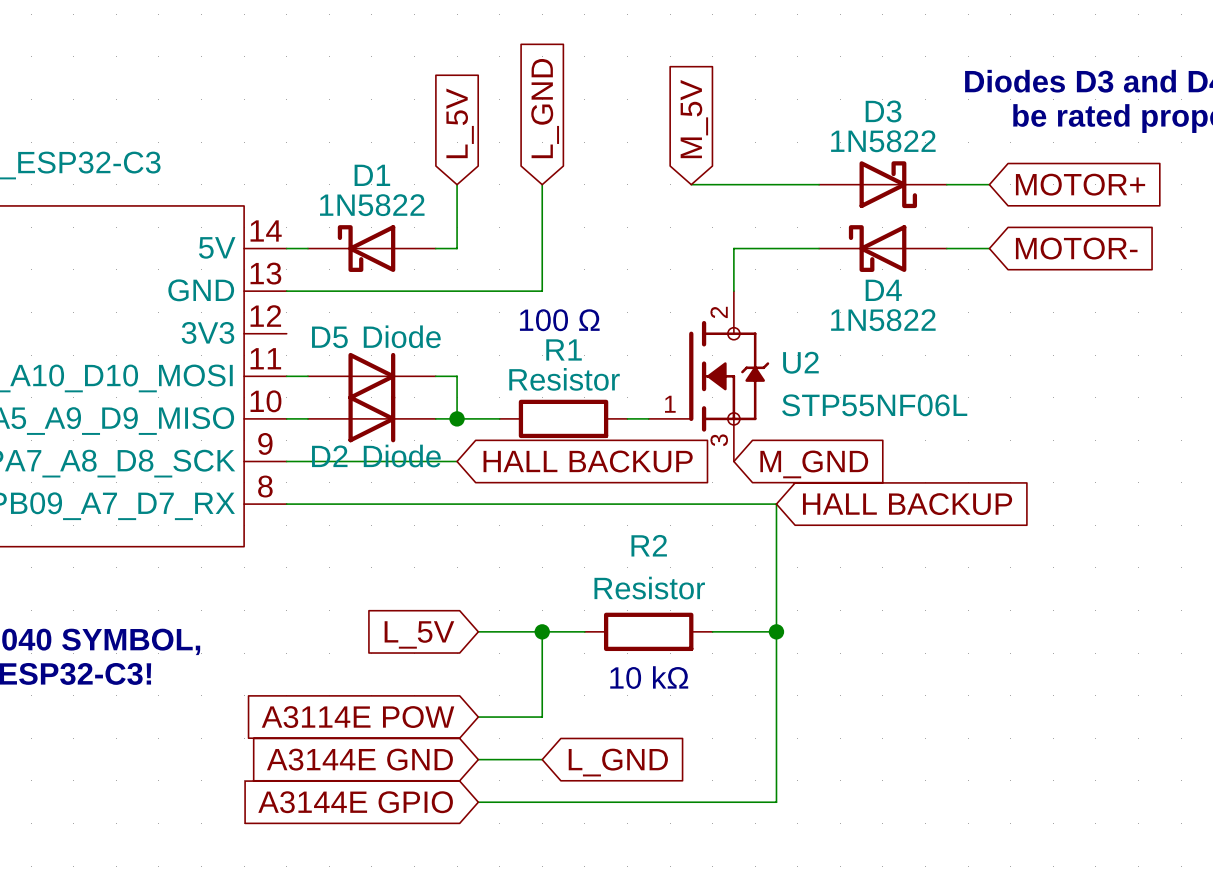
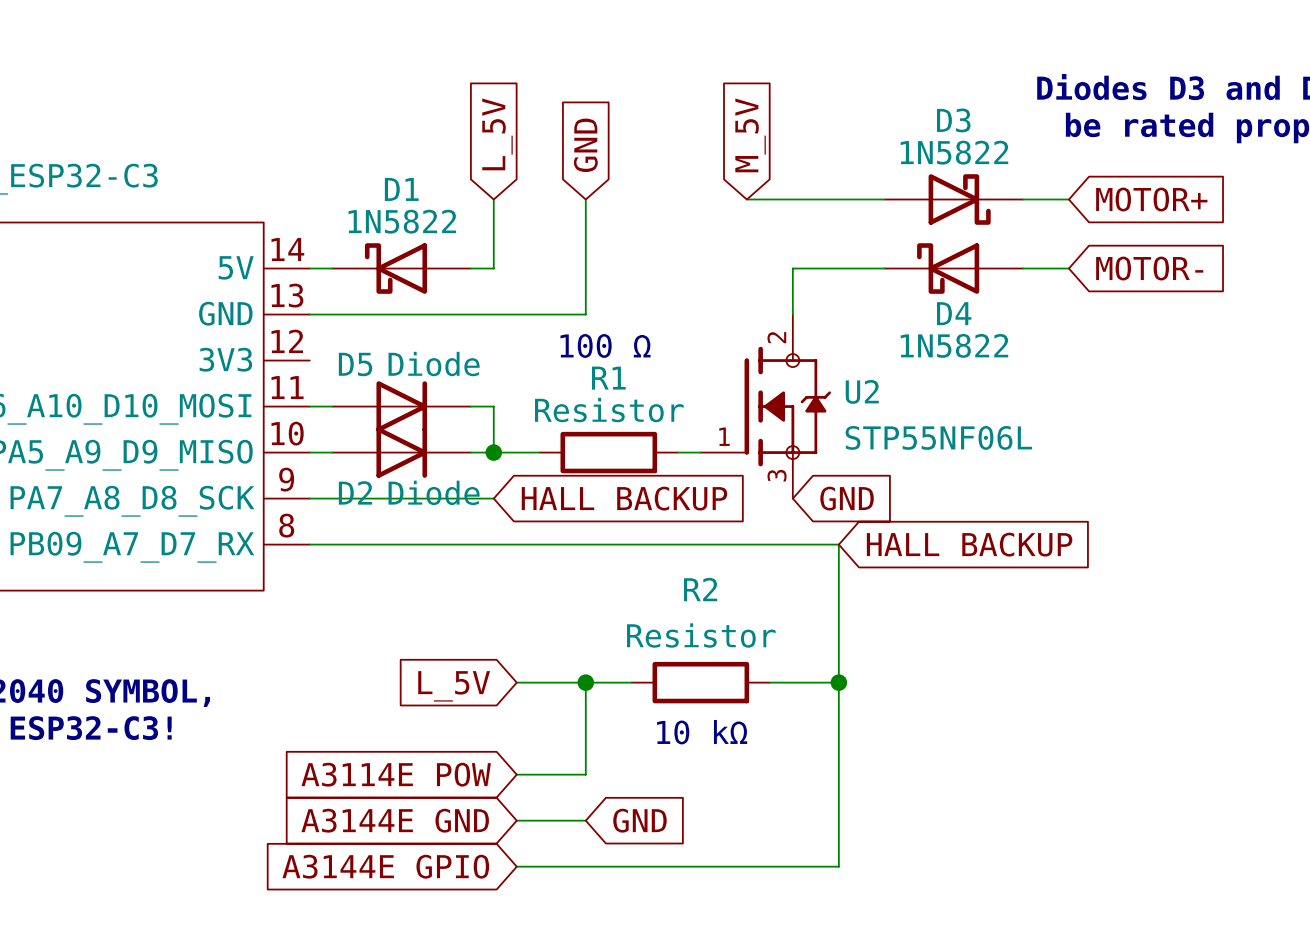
global label: L_GND (545, 108) -> GND (585, 145)
global label: M_GND (814, 464) -> GND (847, 498)
global label: L_GND (618, 762) -> GND (639, 820)

